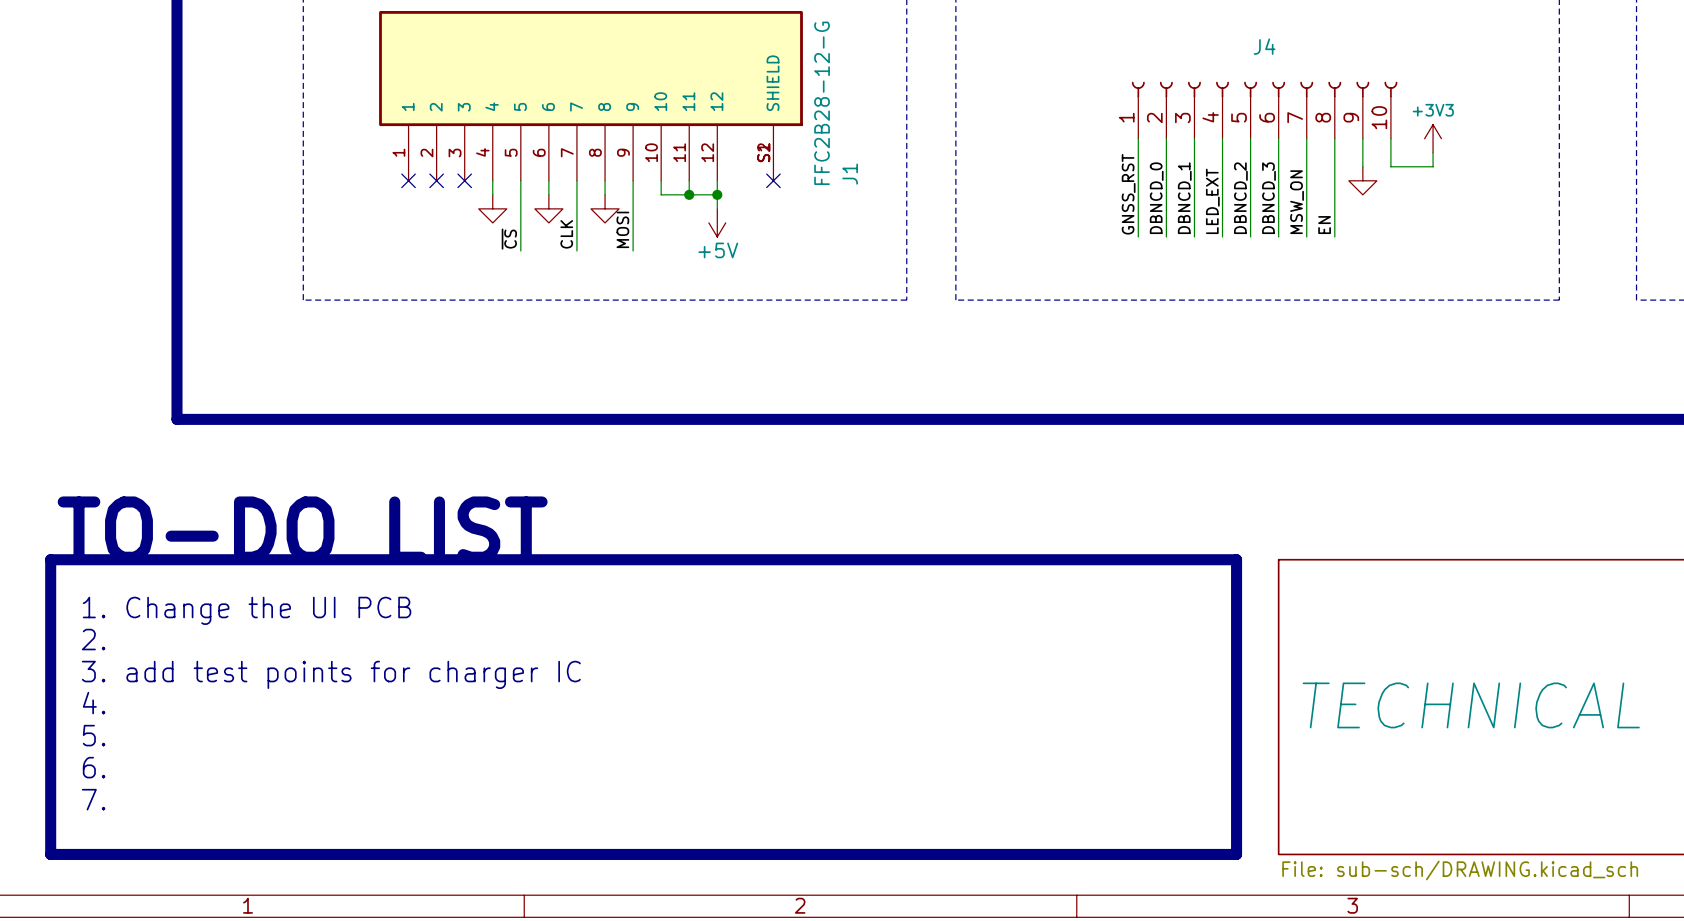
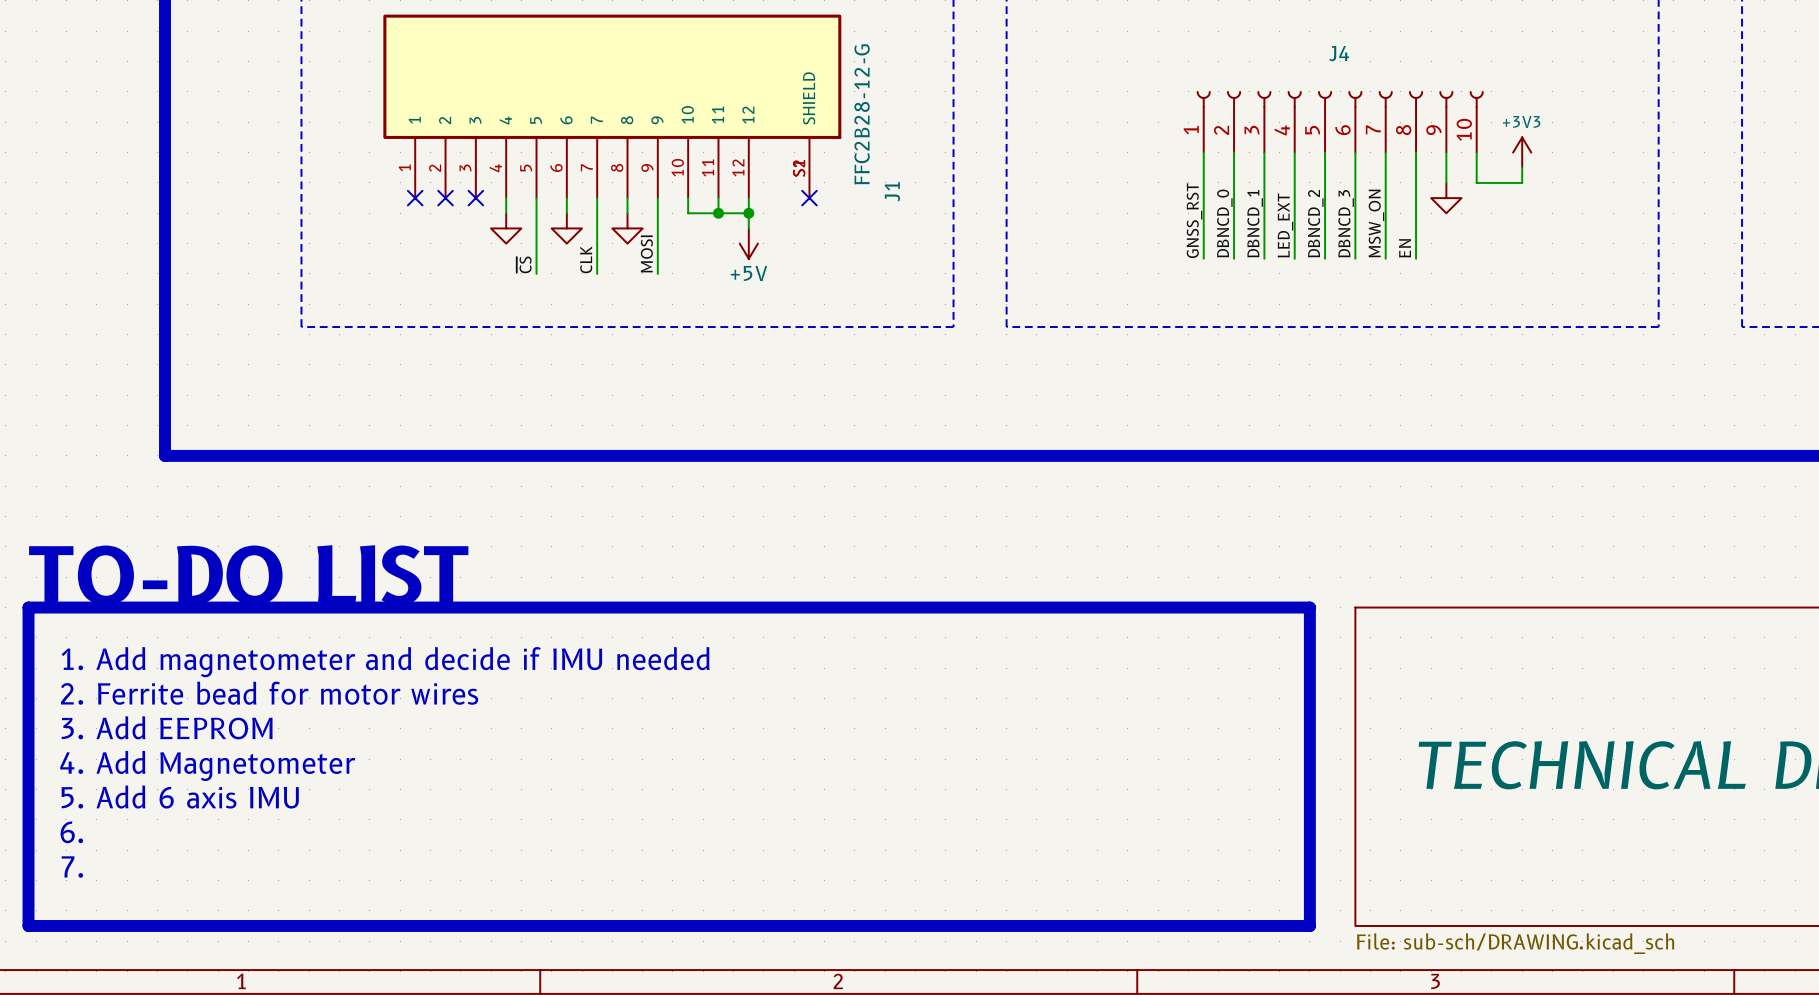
text: 1. Change the UI PCB (247, 610) -> 1. Add magnetometer and decide if IMU needed (385, 662)
text: 2. (93, 639) -> 2. Ferrite bead for motor wires (269, 693)
text: 3. add test points for charger IC (331, 674) -> 3. Add EEPROM (167, 727)
text: 4. (94, 703) -> 4. Add Magnetometer (207, 765)
text: 5. (94, 735) -> 5. Add 6 axis IMU (180, 796)

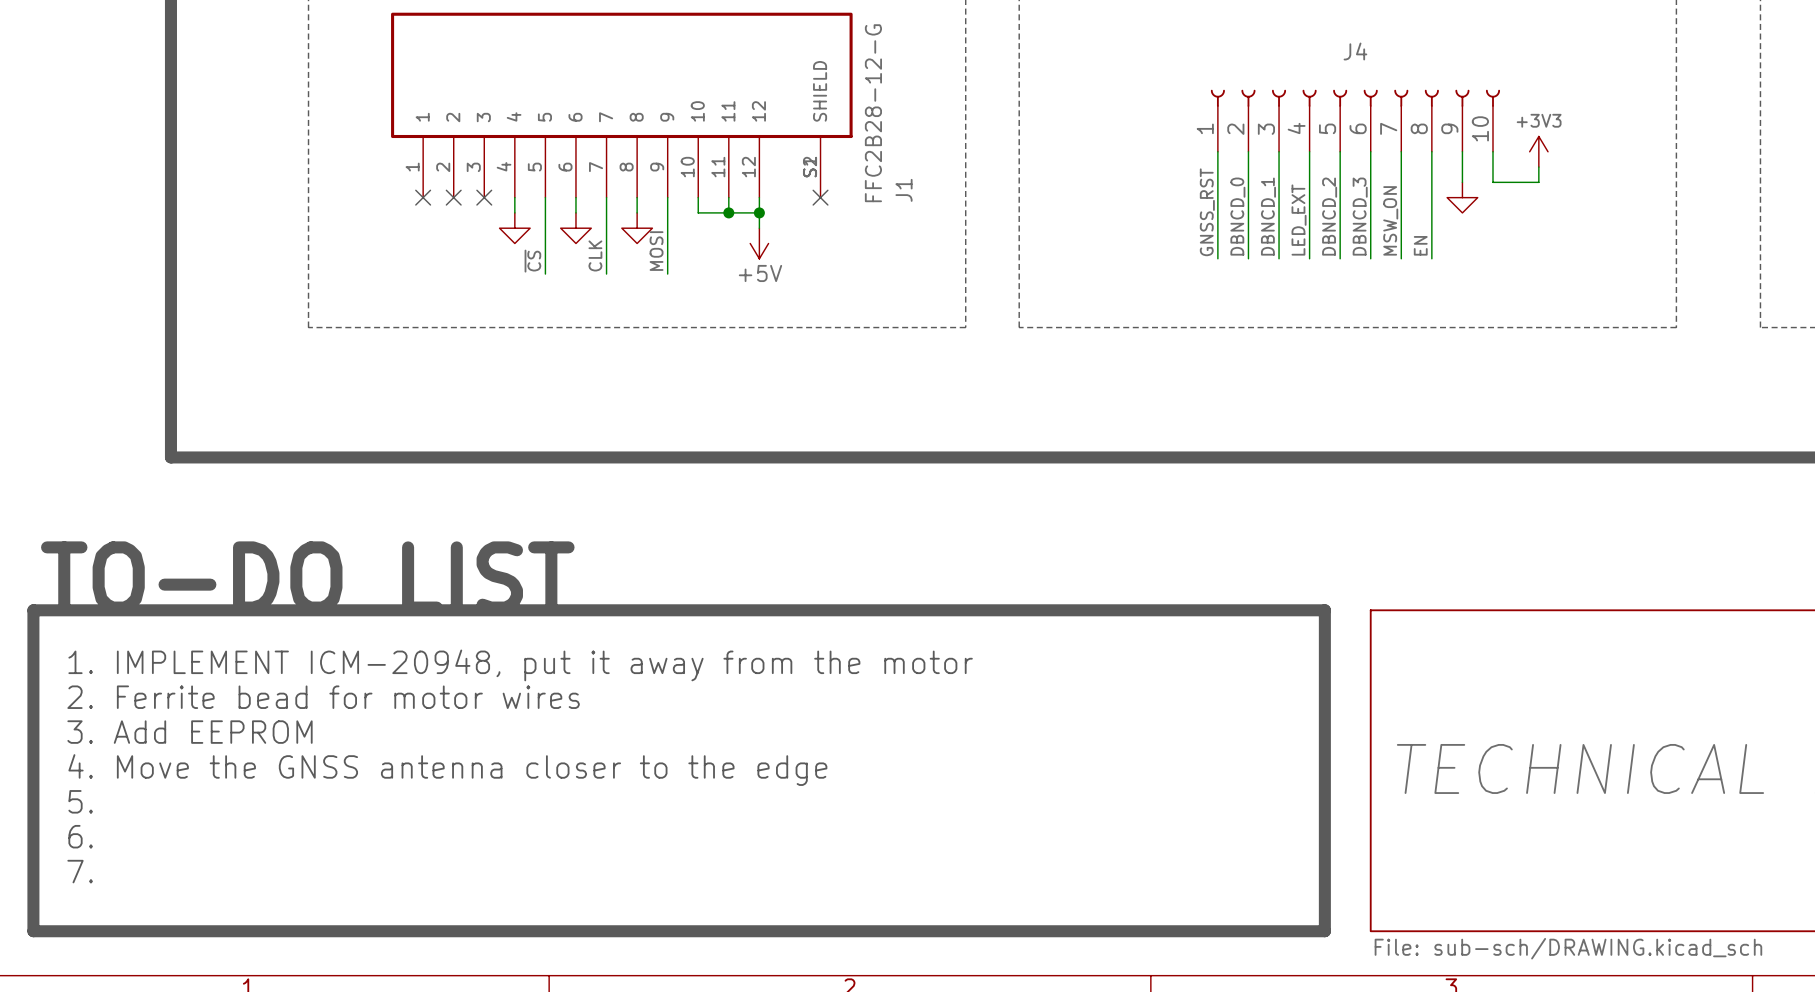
text: 1. Add magnetometer and decide if IMU needed (385, 662) -> 1. IMPLEMENT ICM-20948, put it away from the motor (520, 665)
text: 4. Add Magnetometer (207, 765) -> 4. Move the GNSS antenna closer to the edge (447, 770)
text: 5. Add 6 axis IMU (180, 796) -> 5. (80, 801)

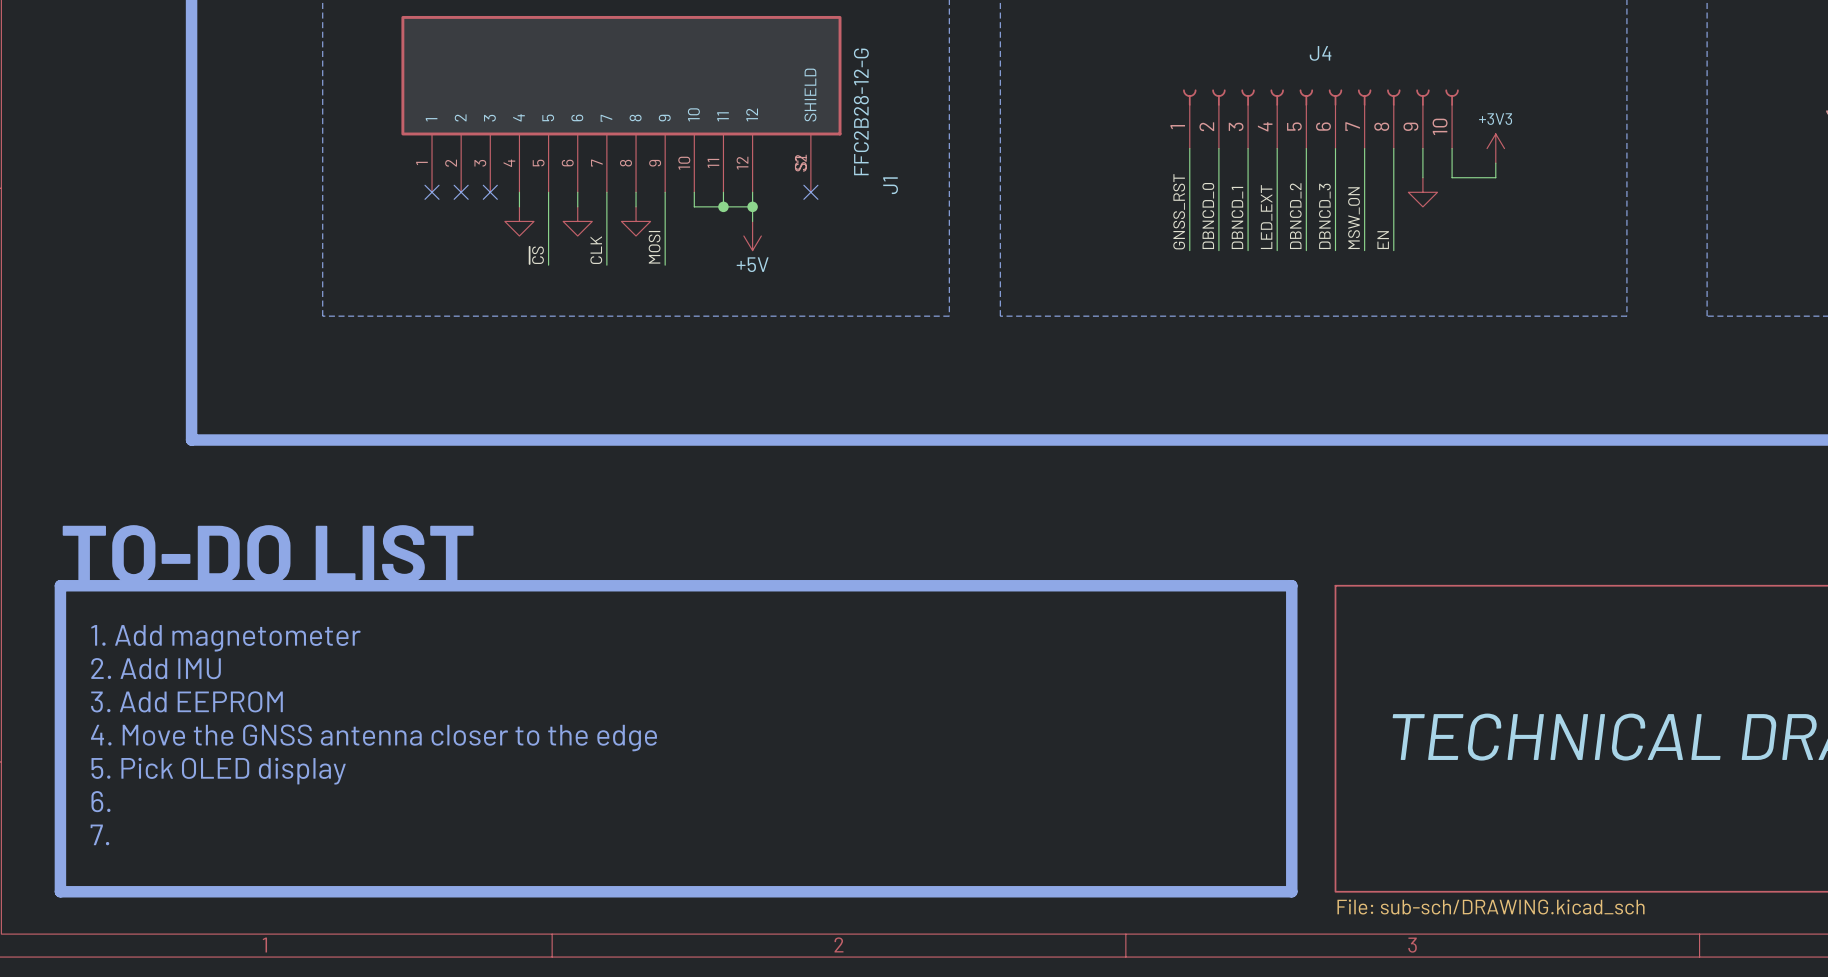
text: 1. IMPLEMENT ICM-20948, put it away from the motor (520, 665) -> 1. Add magnetometer (225, 638)
text: 2. Ferrite bead for motor wires (323, 697) -> 2. Add IMU (156, 668)
text: 5. (80, 801) -> 5. Pick OLED display (218, 771)

